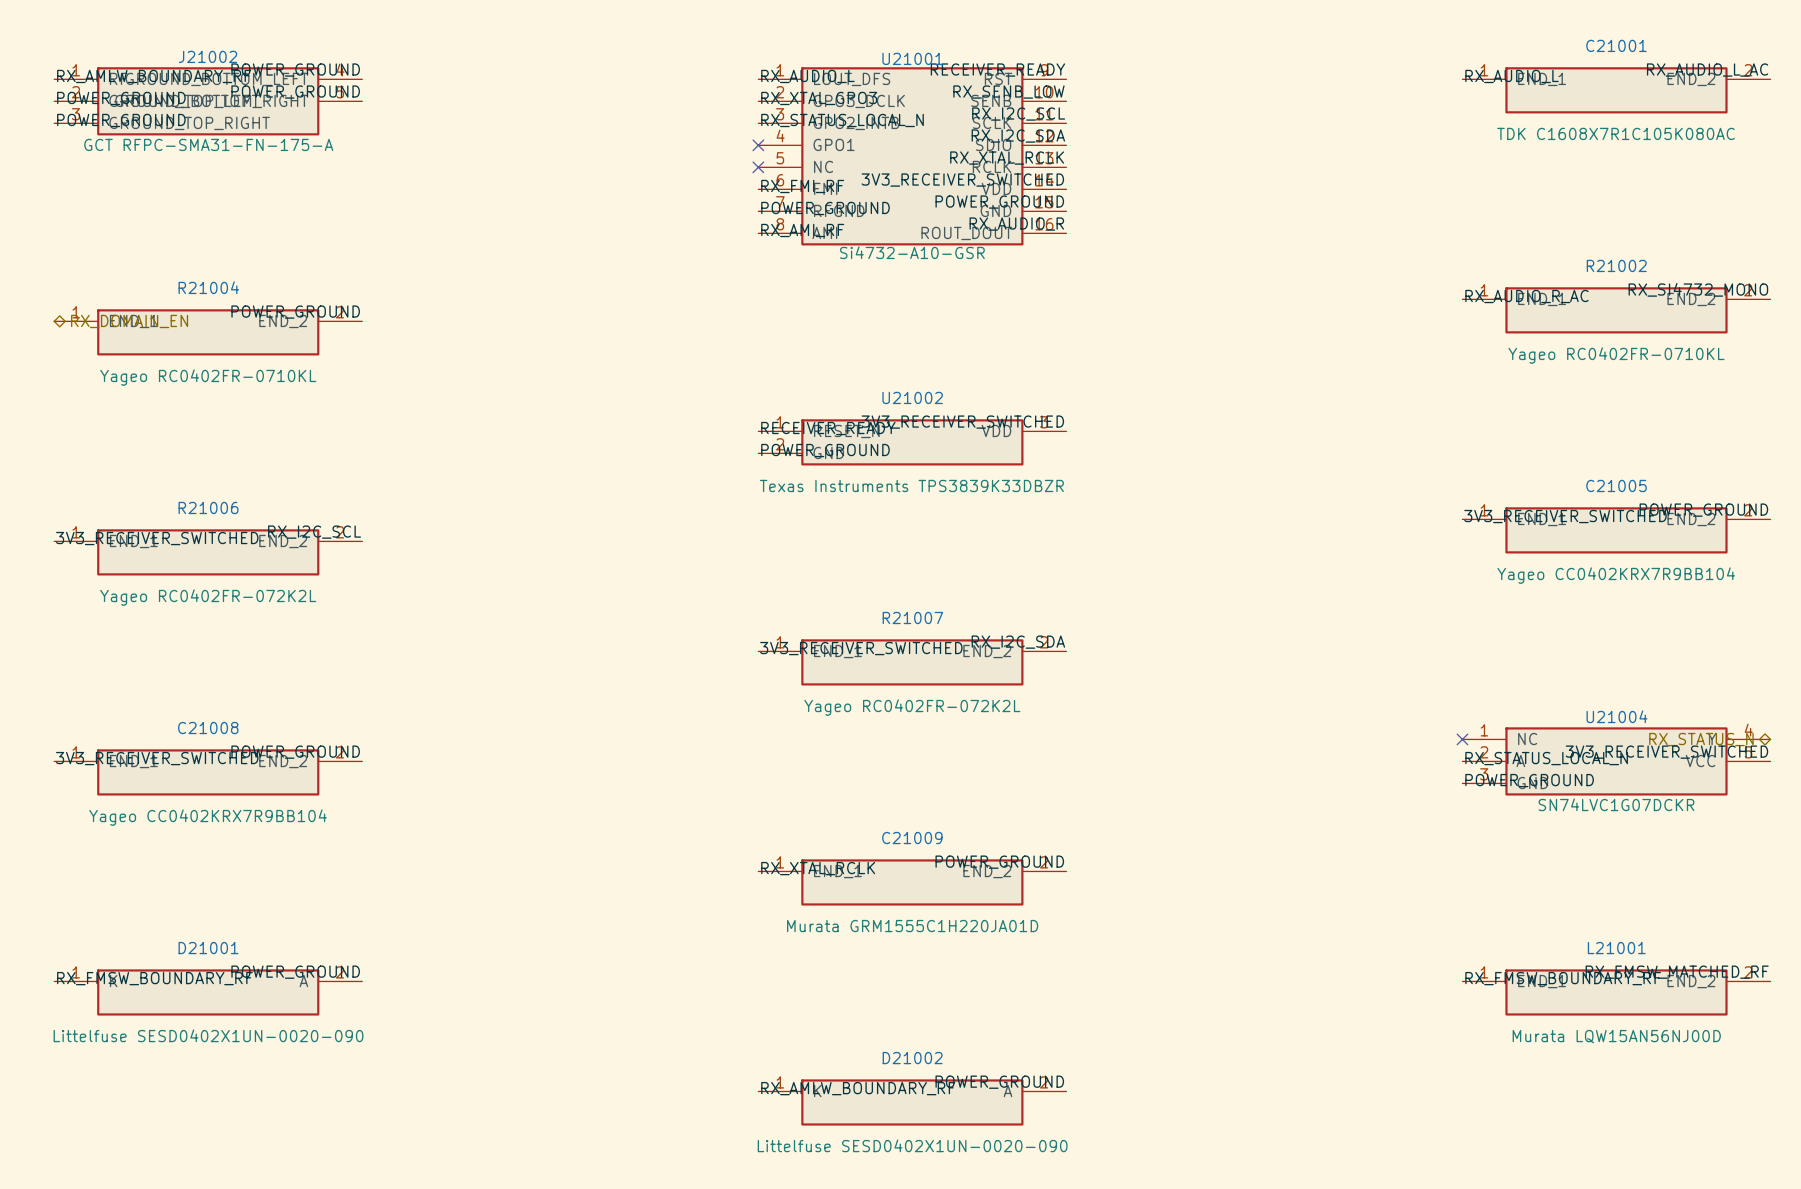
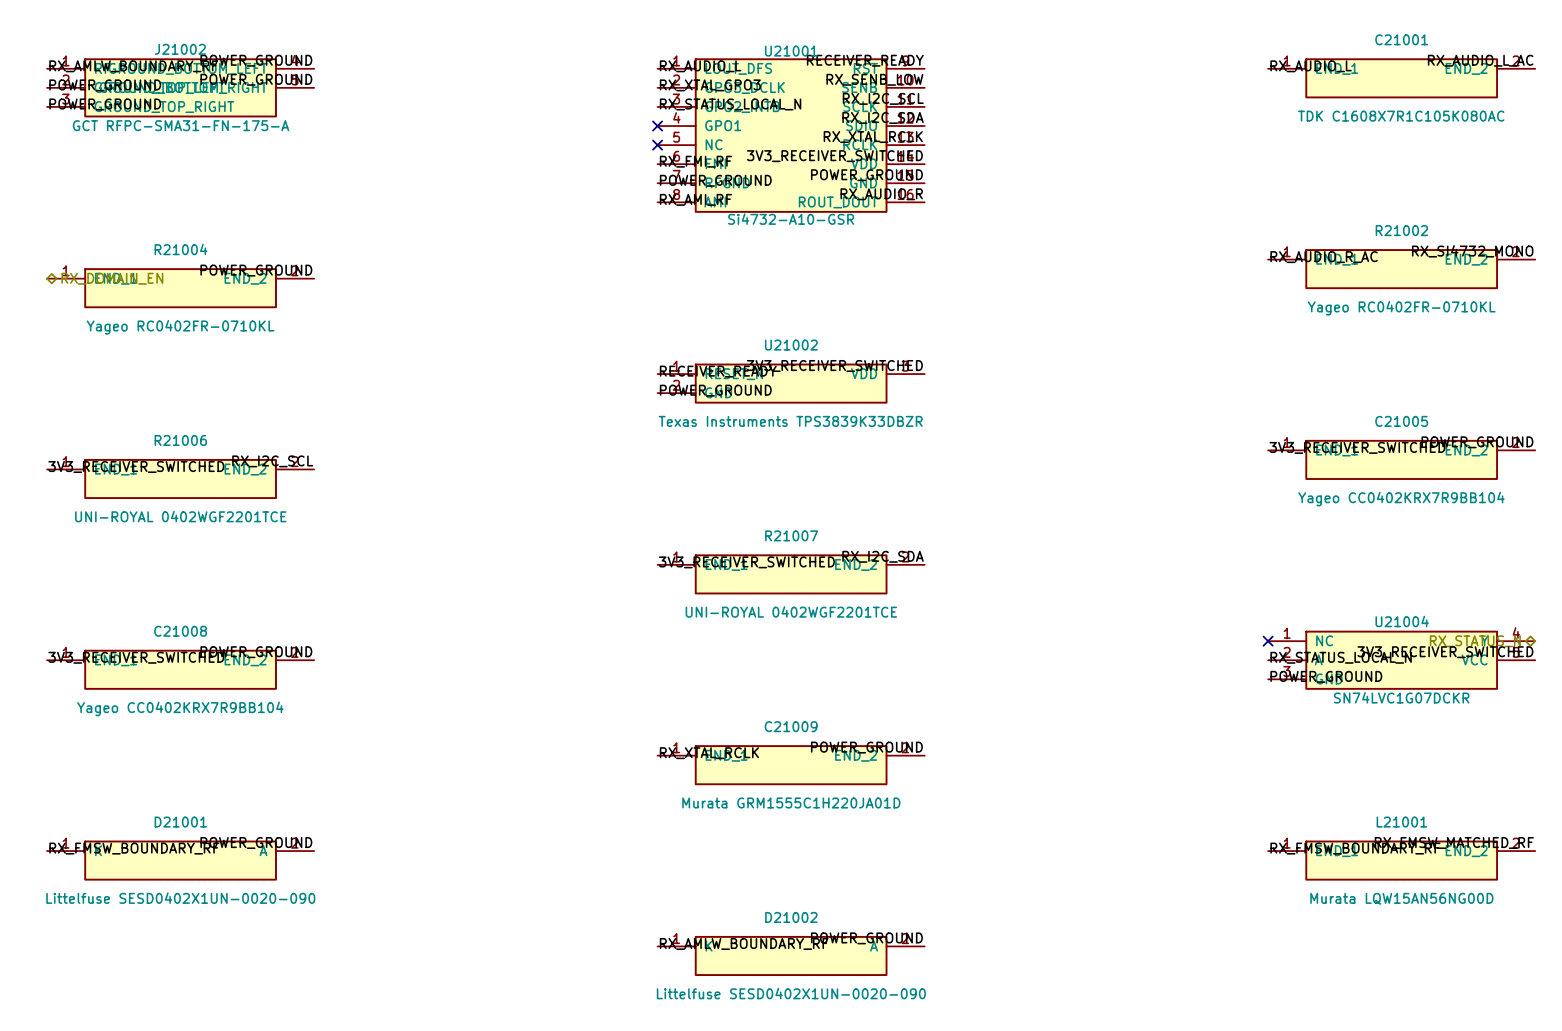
R21006 value: Yageo RC0402FR-072K2L (208, 597) -> UNI-ROYAL 0402WGF2201TCE (180, 516)
R21007 value: Yageo RC0402FR-072K2L (912, 707) -> UNI-ROYAL 0402WGF2201TCE (791, 611)
L21001 value: Murata LQW15AN56NJ00D (1616, 1036) -> Murata LQW15AN56NG00D (1401, 898)

